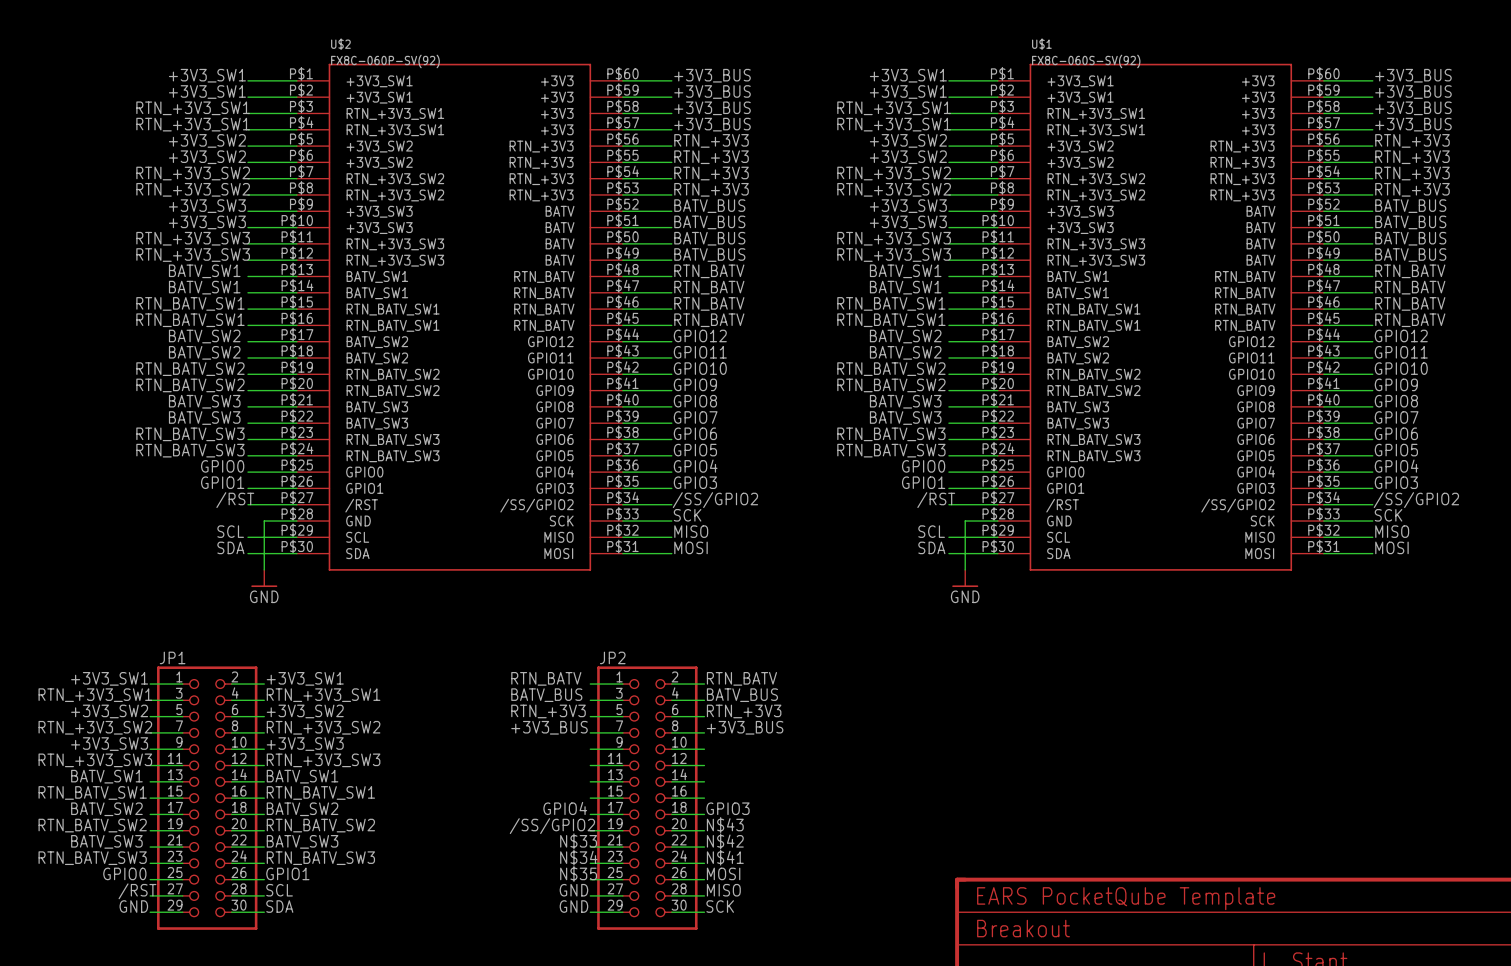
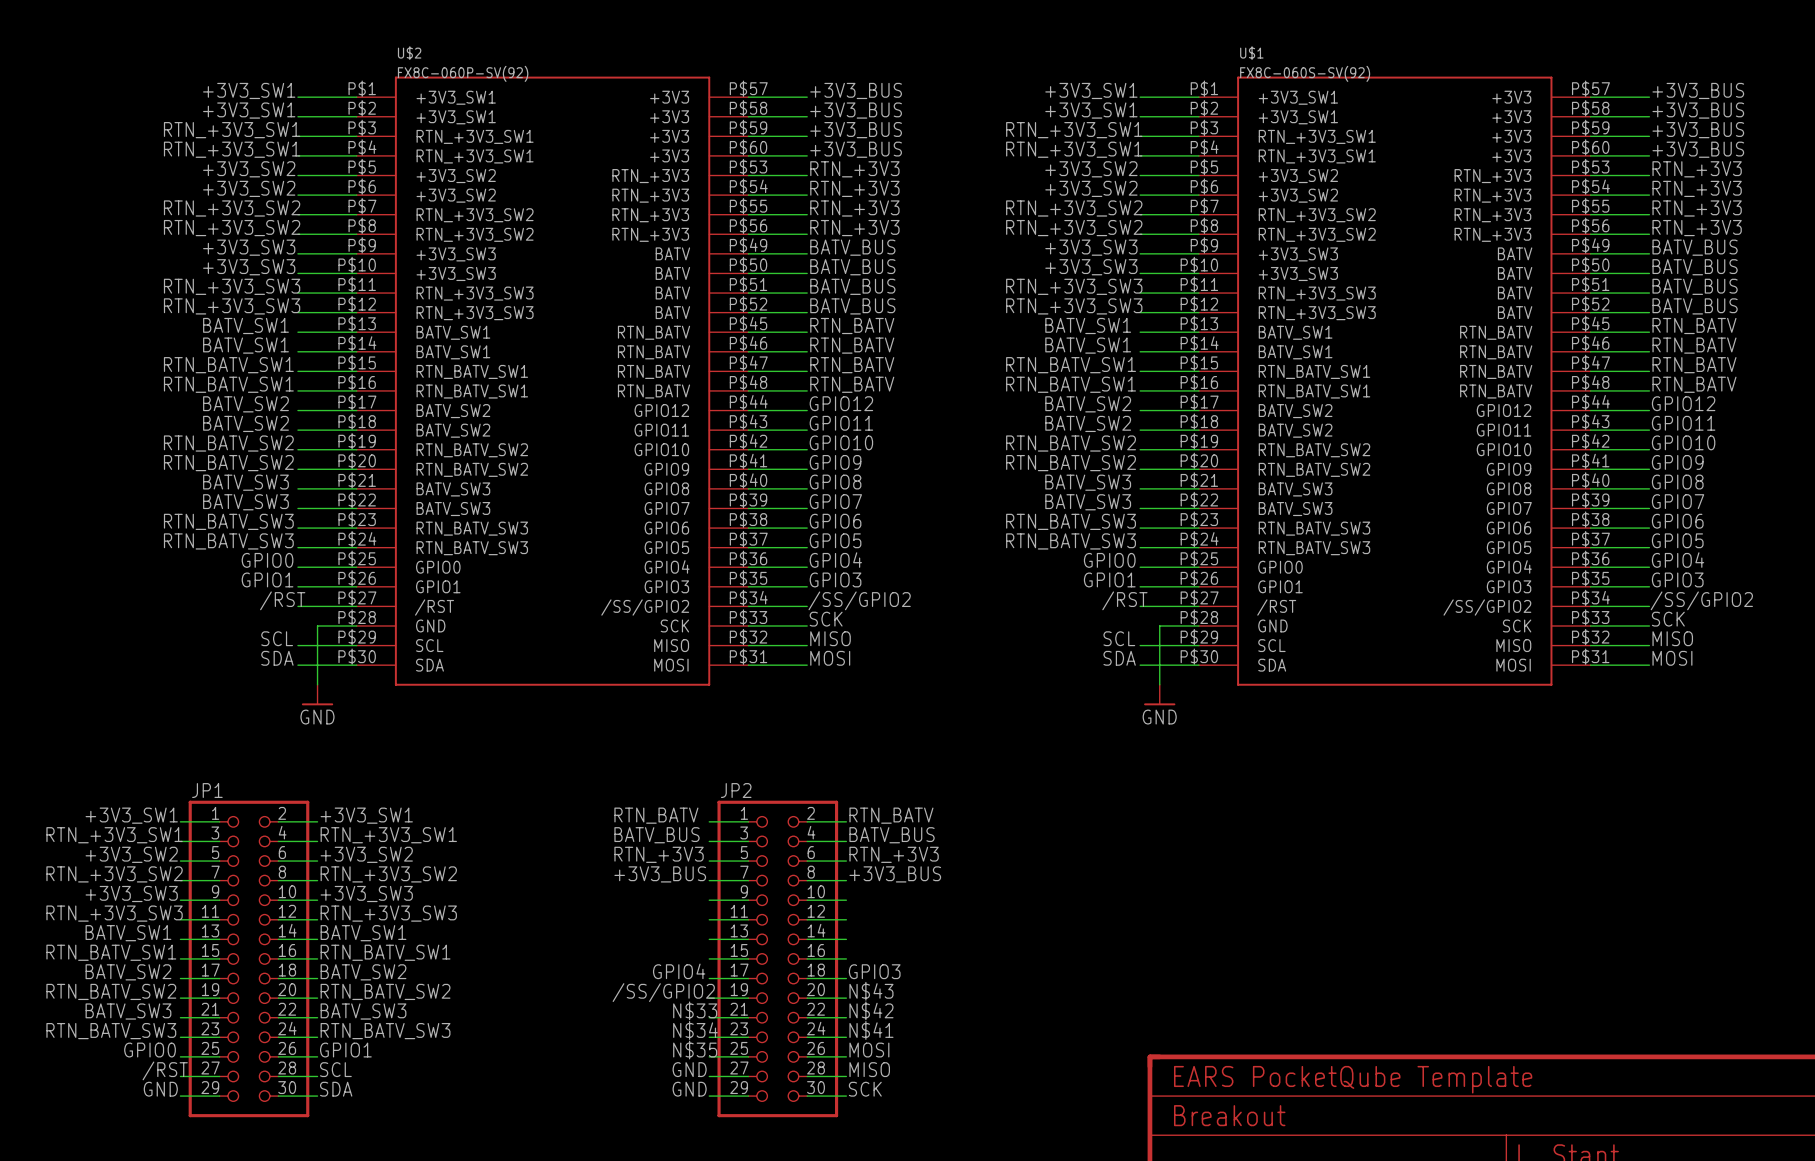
U$2 symbol: [296, 63, 623, 571] -> [356, 76, 749, 686]
U$1 symbol: [997, 63, 1324, 571] -> [1198, 76, 1591, 686]

